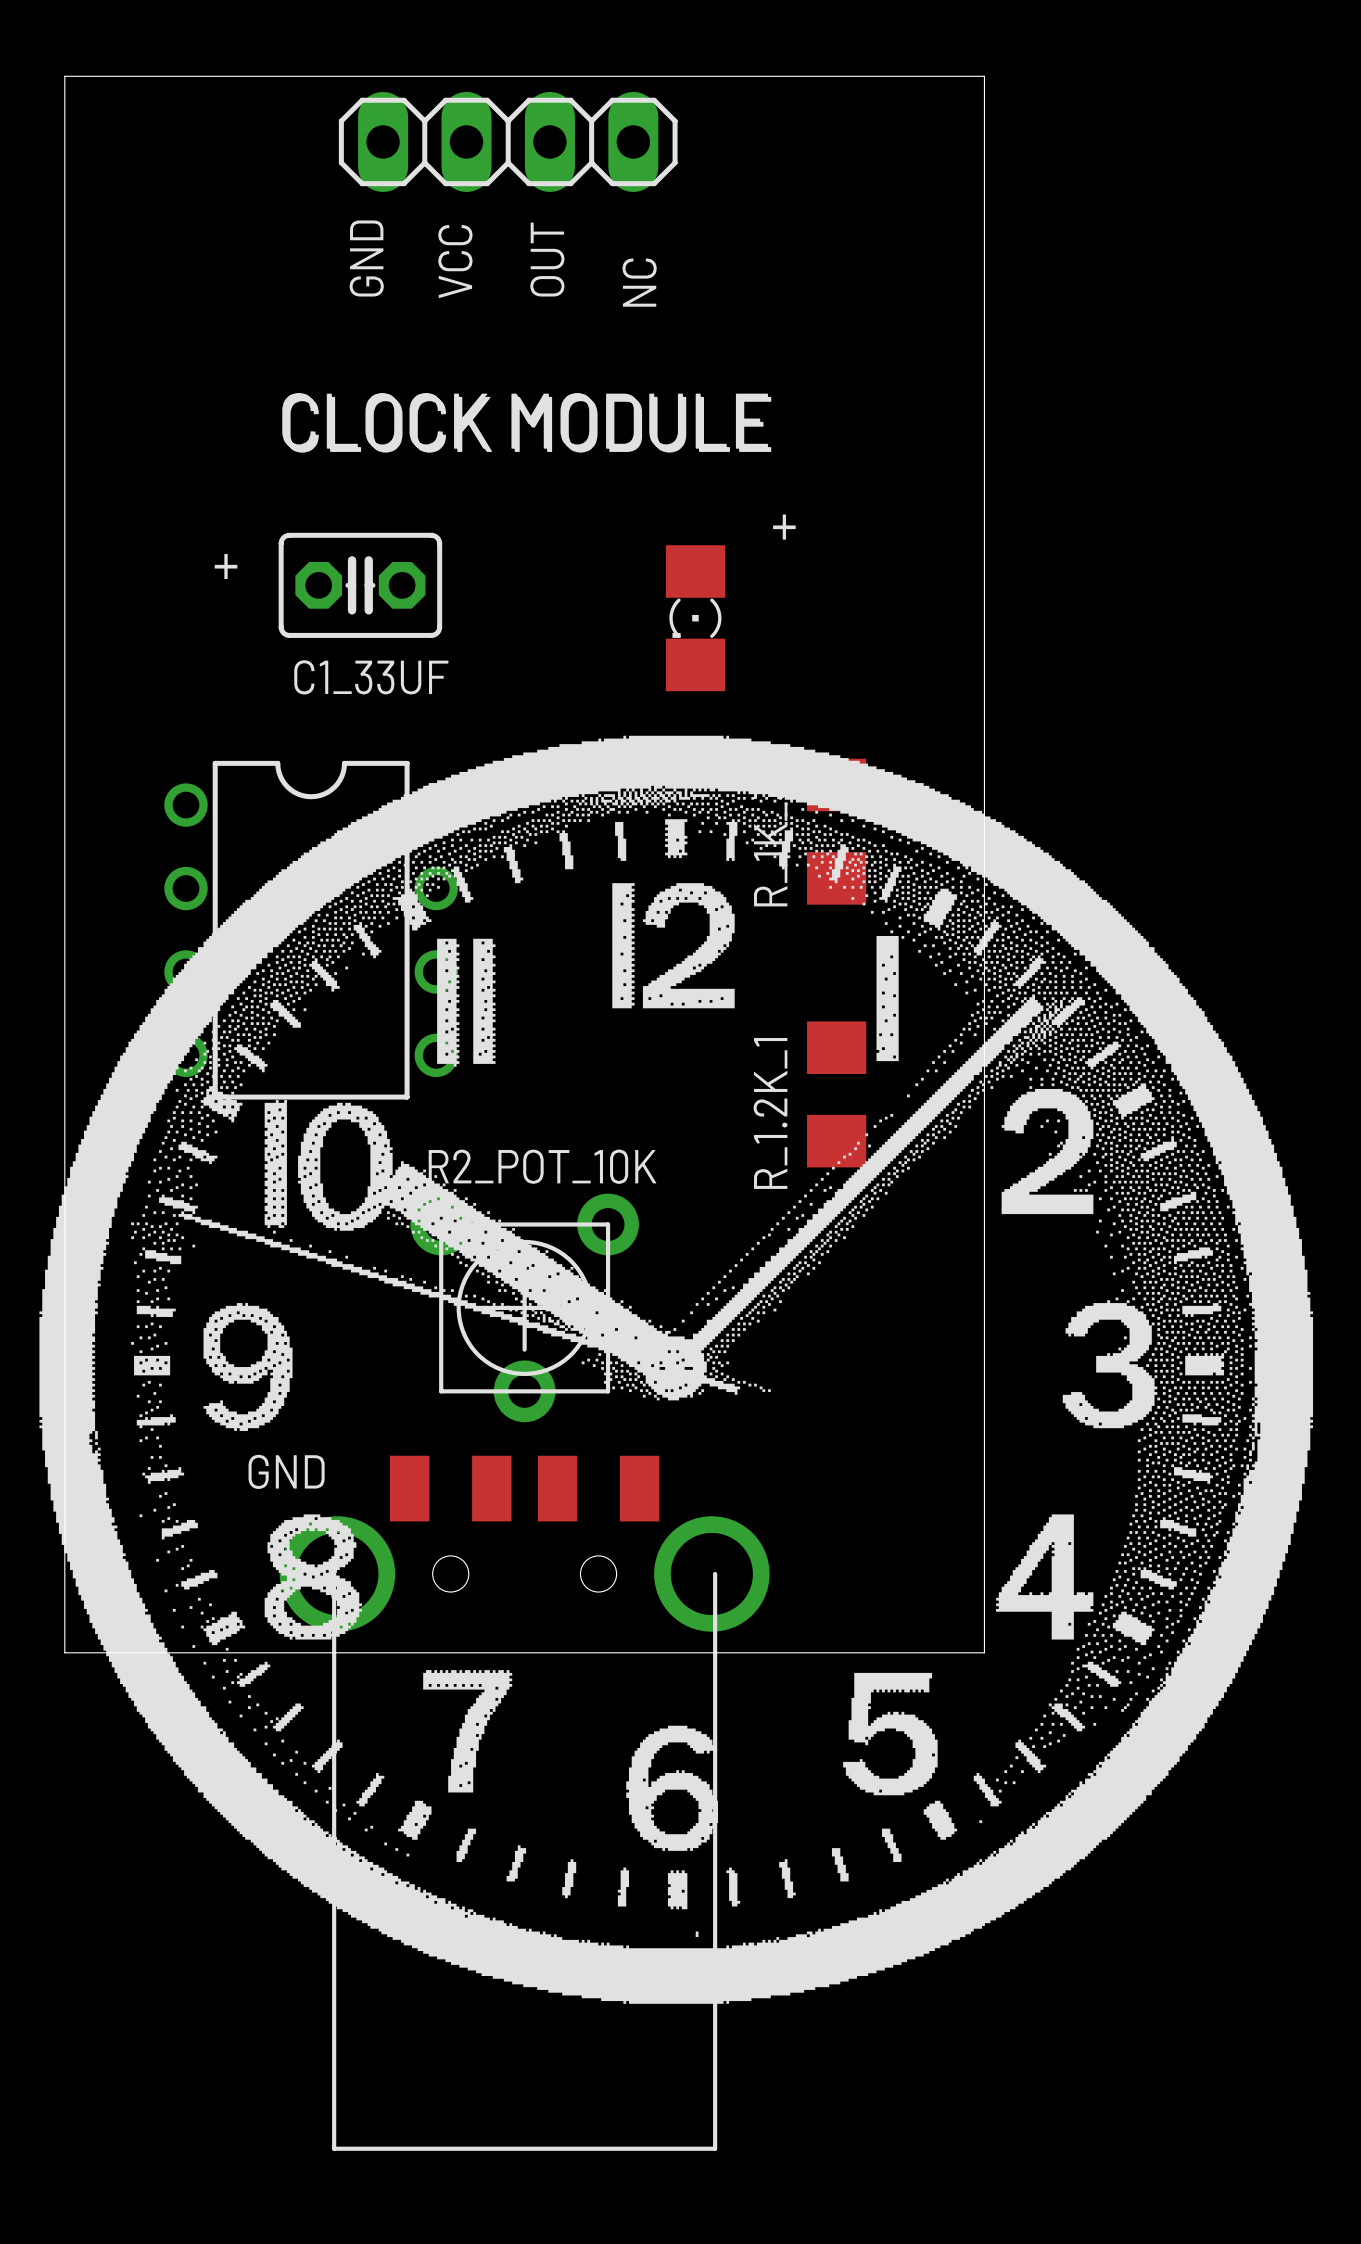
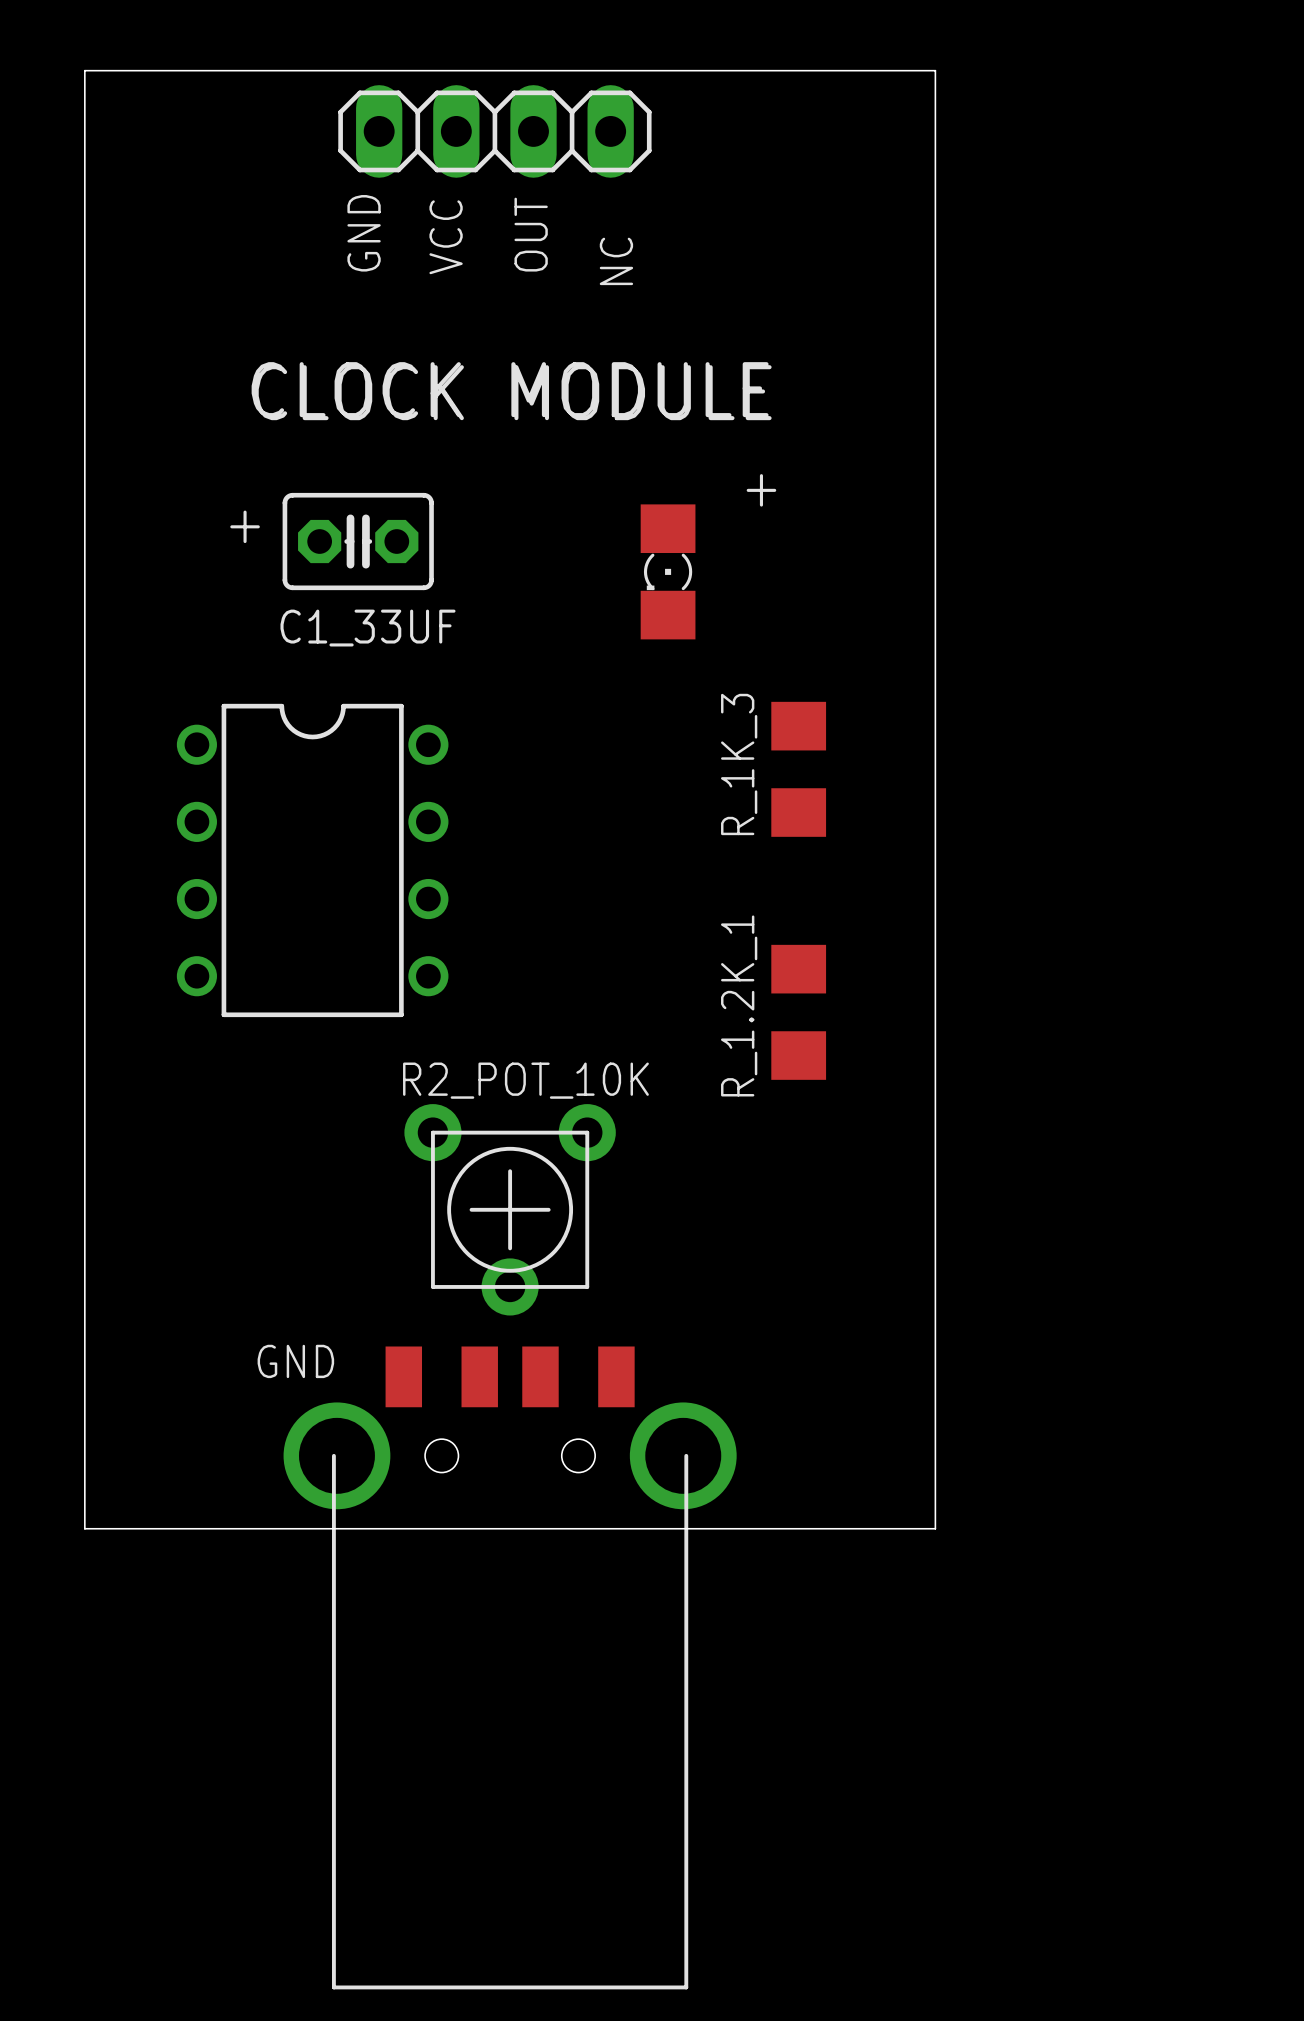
drawing: [39, 735, 1314, 2004] -> none

